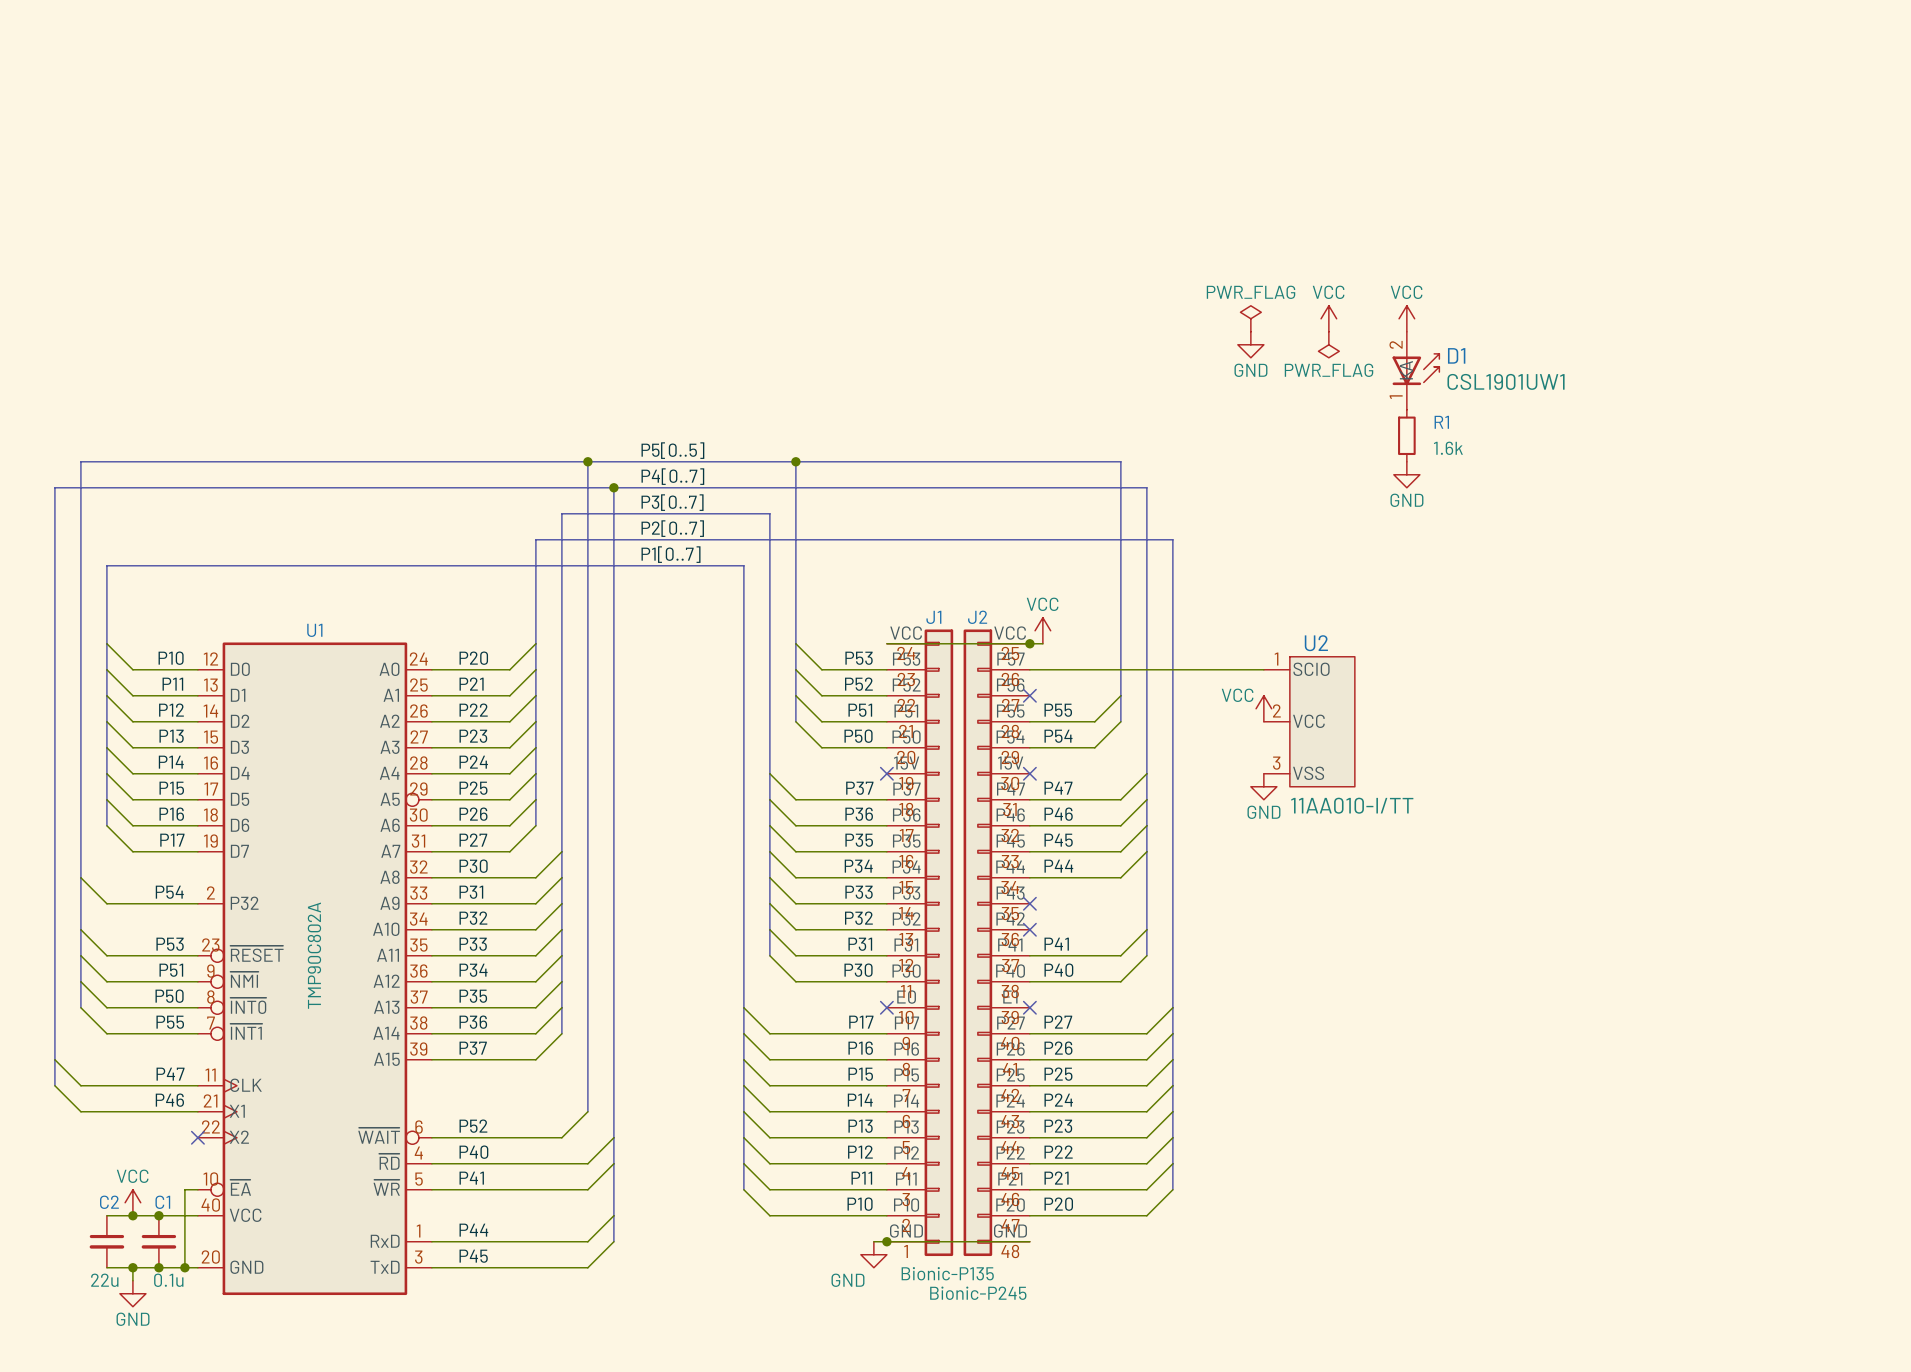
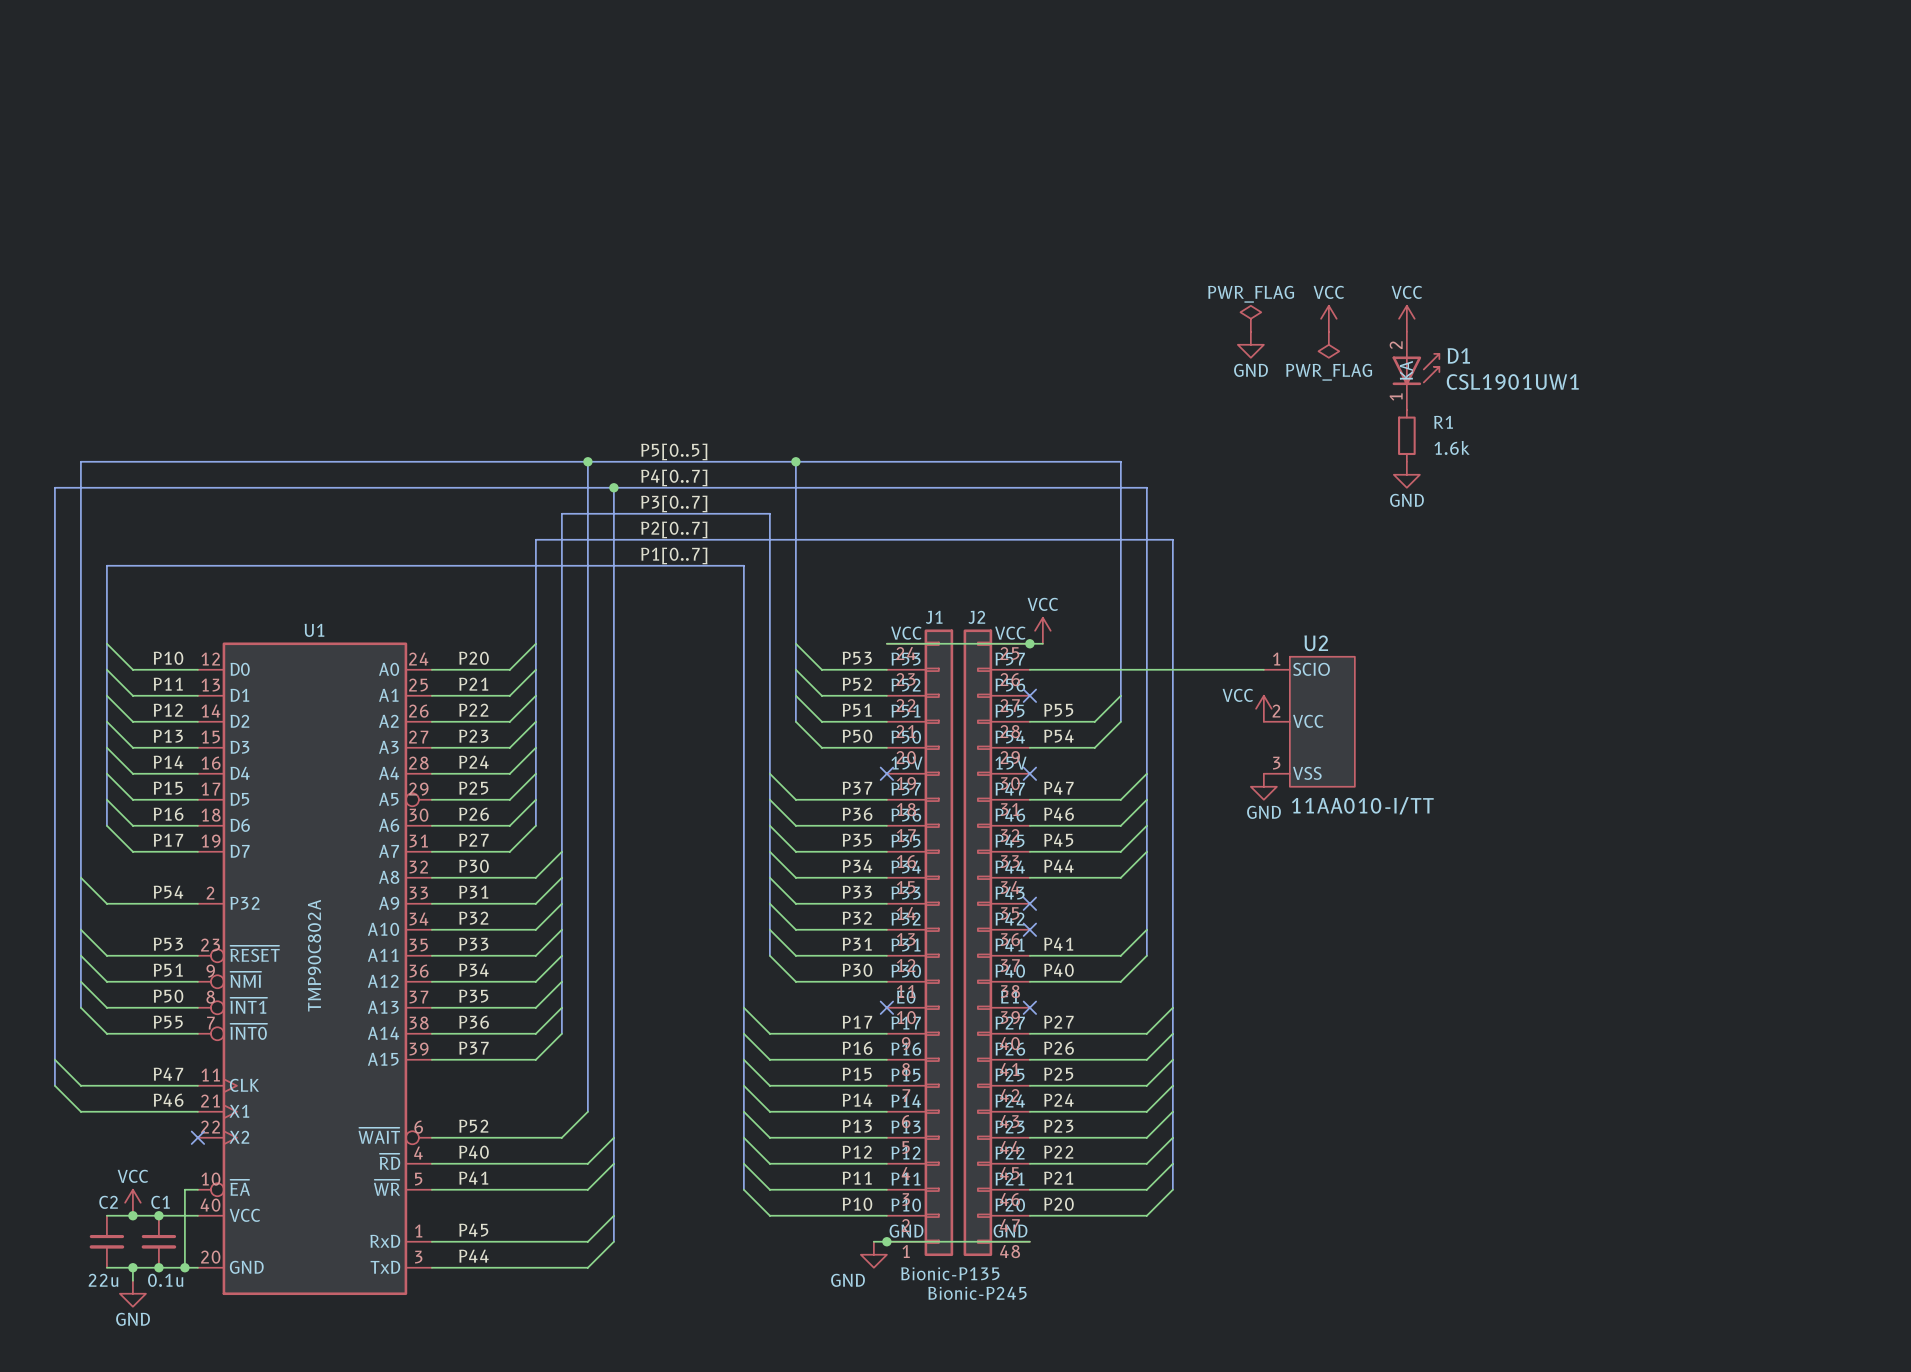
U1 pin name: ~{INT0} (248, 1005) -> ~{INT1} (248, 1005)
U1 pin name: ~{INT1} (246, 1031) -> ~{INT0} (248, 1031)
label: P44 (473, 1230) -> P45 (473, 1230)
label: P45 (473, 1256) -> P44 (473, 1256)

